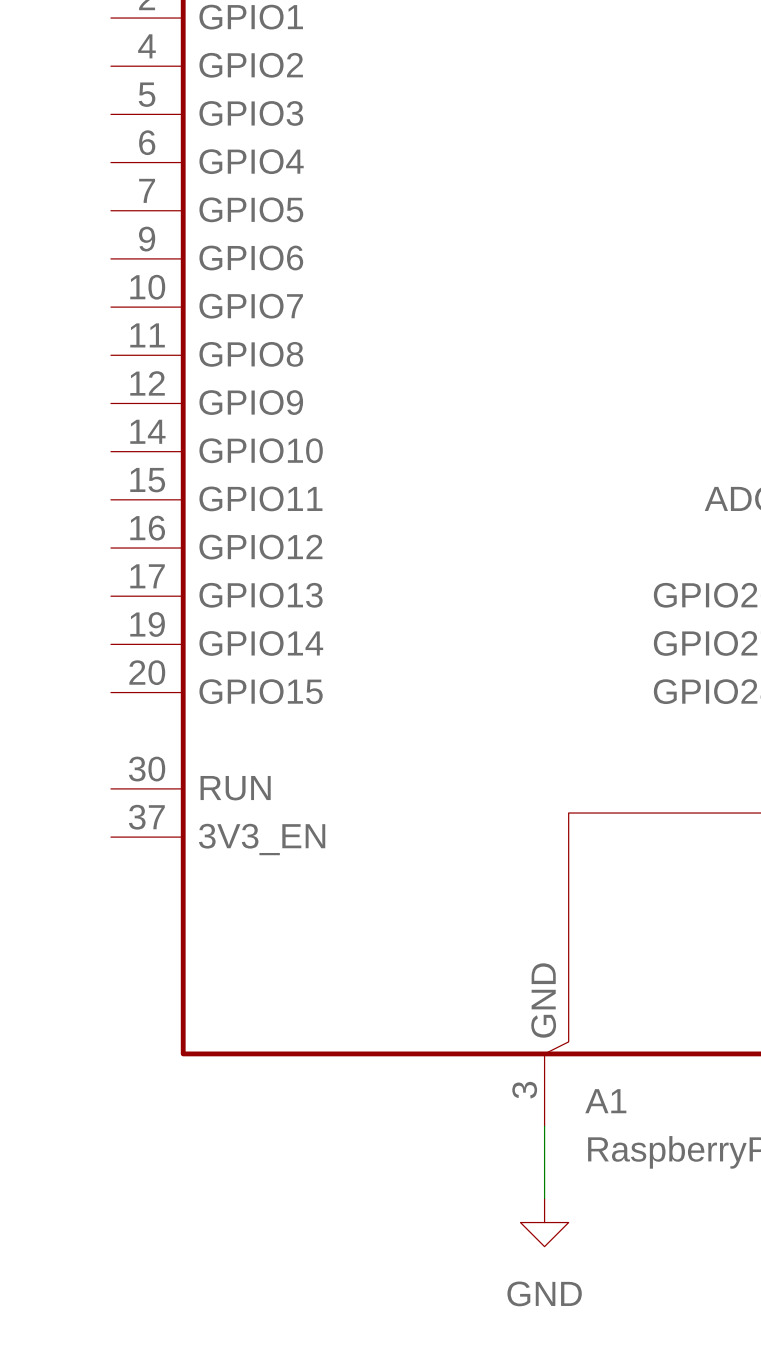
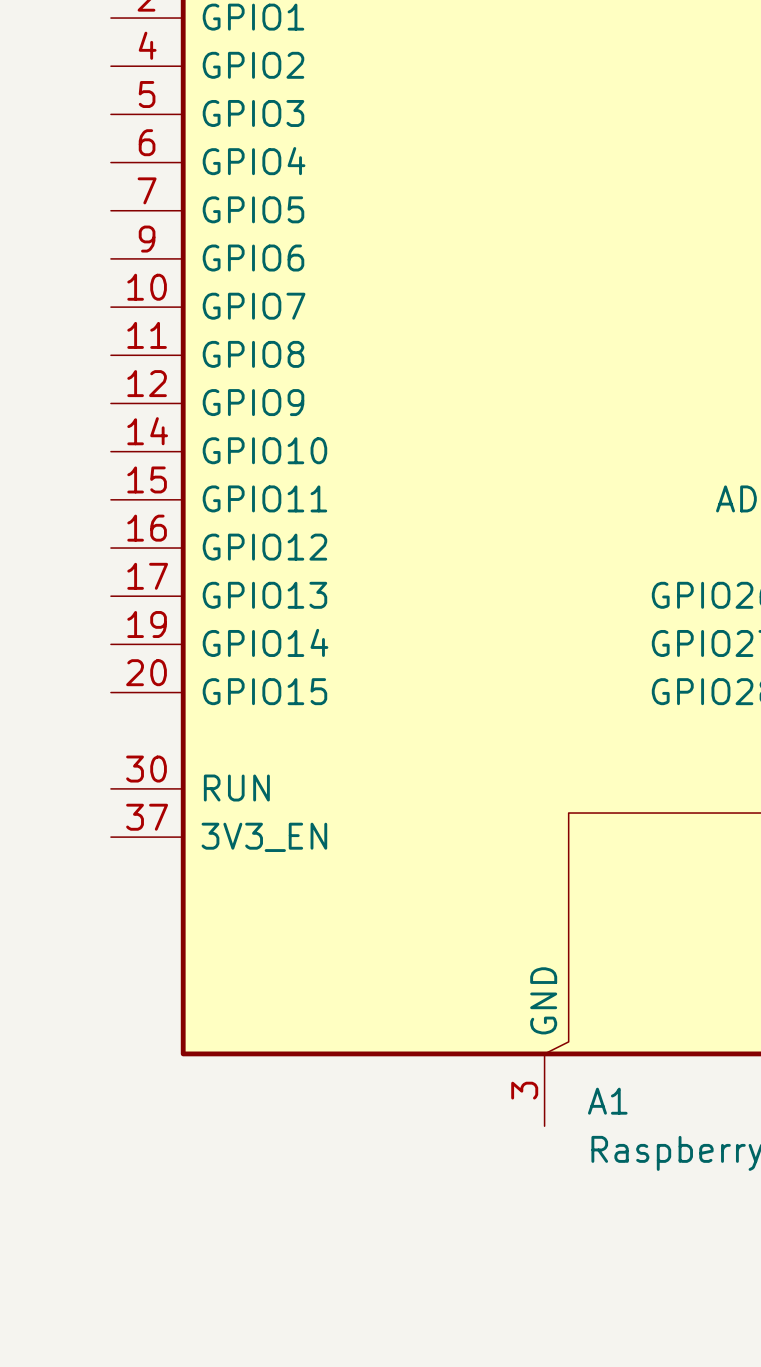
wire: (544, 1126) (544, 1198) -> none
power symbol: GND (544, 1222) -> none

